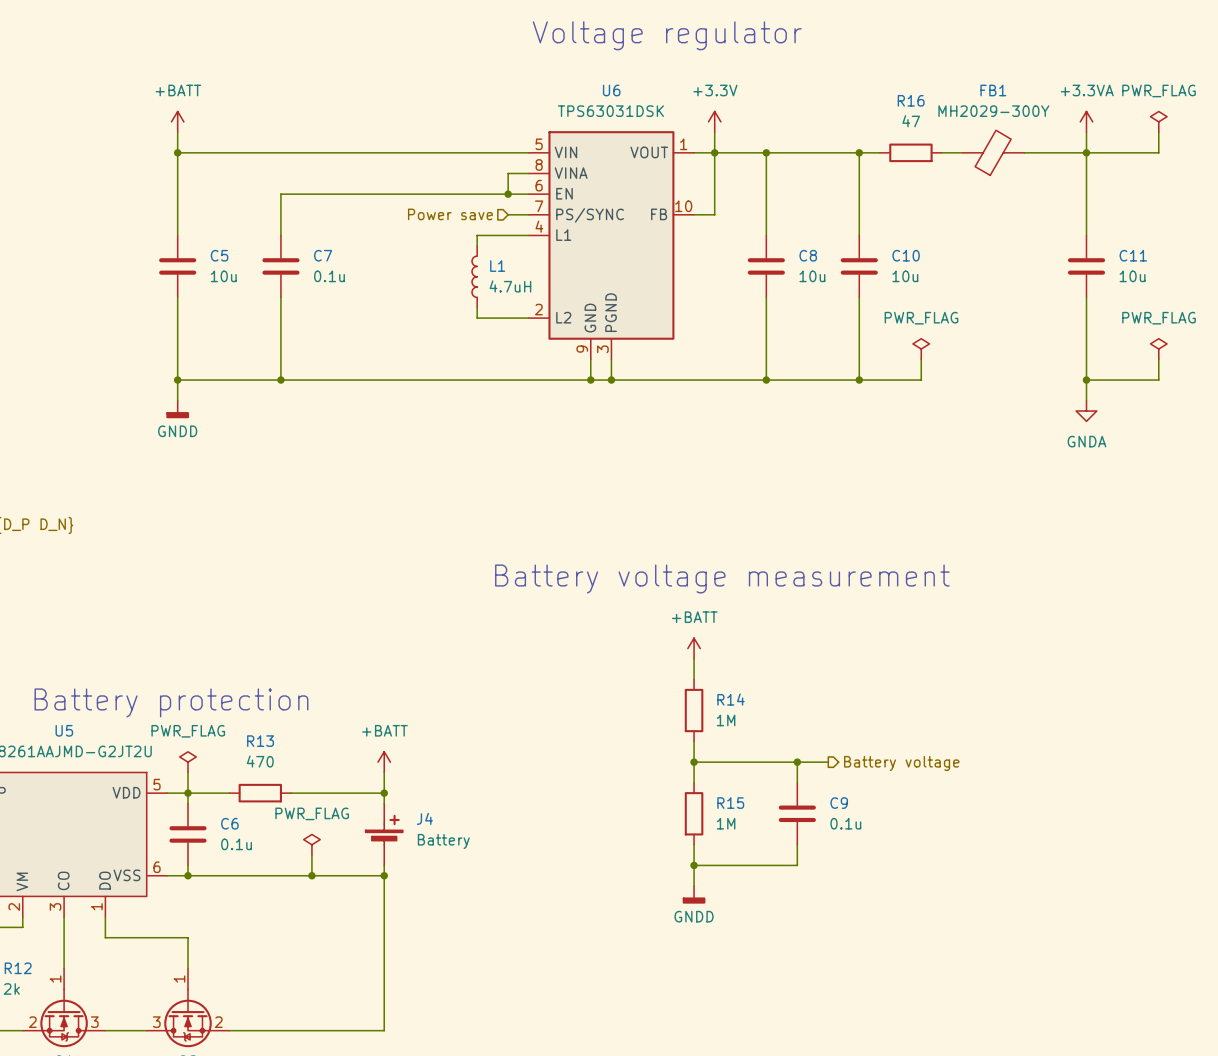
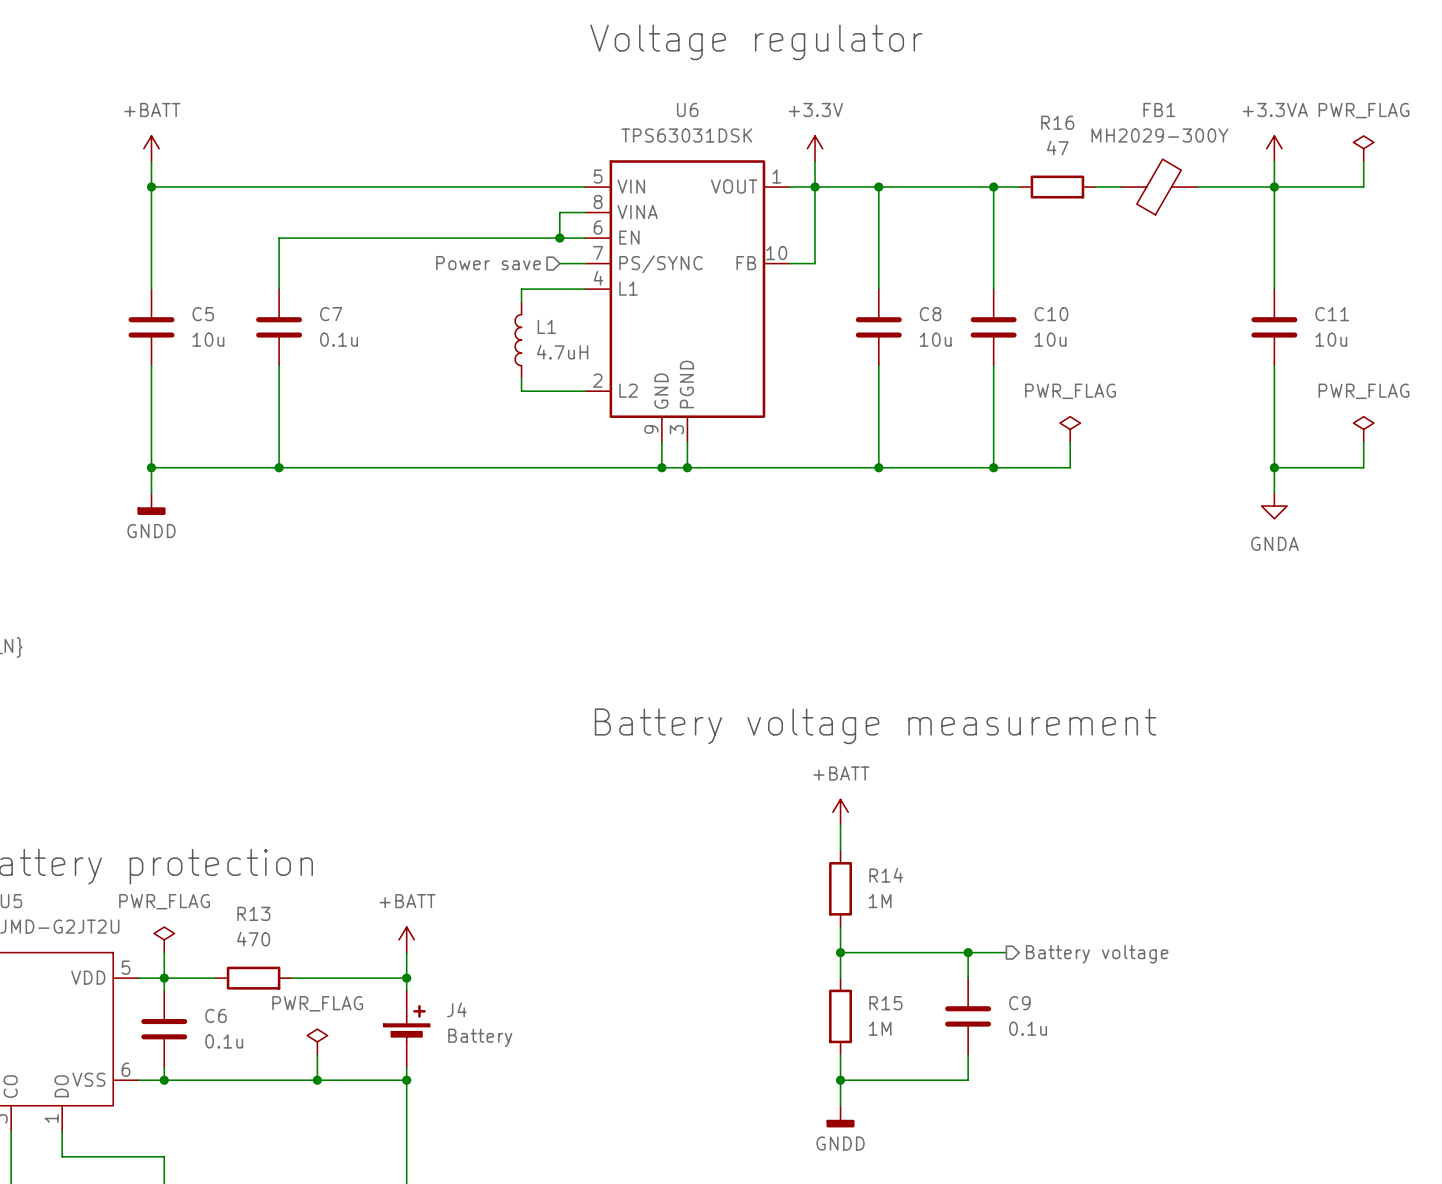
text position: Battery voltage measurement (722, 578) -> Battery voltage measurement (875, 726)
power symbol position: +BATT (694, 648) -> +BATT (840, 812)
wire: (694, 658) (694, 679) -> (840, 825) (840, 850)
R14 position: (694, 710) -> (840, 888)
wire: (694, 741) (694, 782) -> (840, 927) (840, 978)
wire: (694, 762) (828, 762) -> (840, 952) (1006, 952)
junction: (694, 762) -> none
wire: (797, 762) (797, 782) -> (968, 952) (968, 978)
junction: (797, 762) -> none
hierarchical label position: Battery voltage (901, 763) -> Battery voltage (1097, 954)
junction: none -> (840, 952)
junction: none -> (968, 952)
R15 position: (694, 813) -> (840, 1016)
C9 position: (797, 813) -> (968, 1016)
wire: (694, 844) (694, 886) -> (840, 1054) (840, 1105)
wire: (797, 844) (797, 865) (694, 865) -> (968, 1054) (968, 1080) (840, 1080)
junction position: (694, 865) -> (840, 1080)
power symbol position: GNDD (694, 894) -> GNDD (840, 1116)

